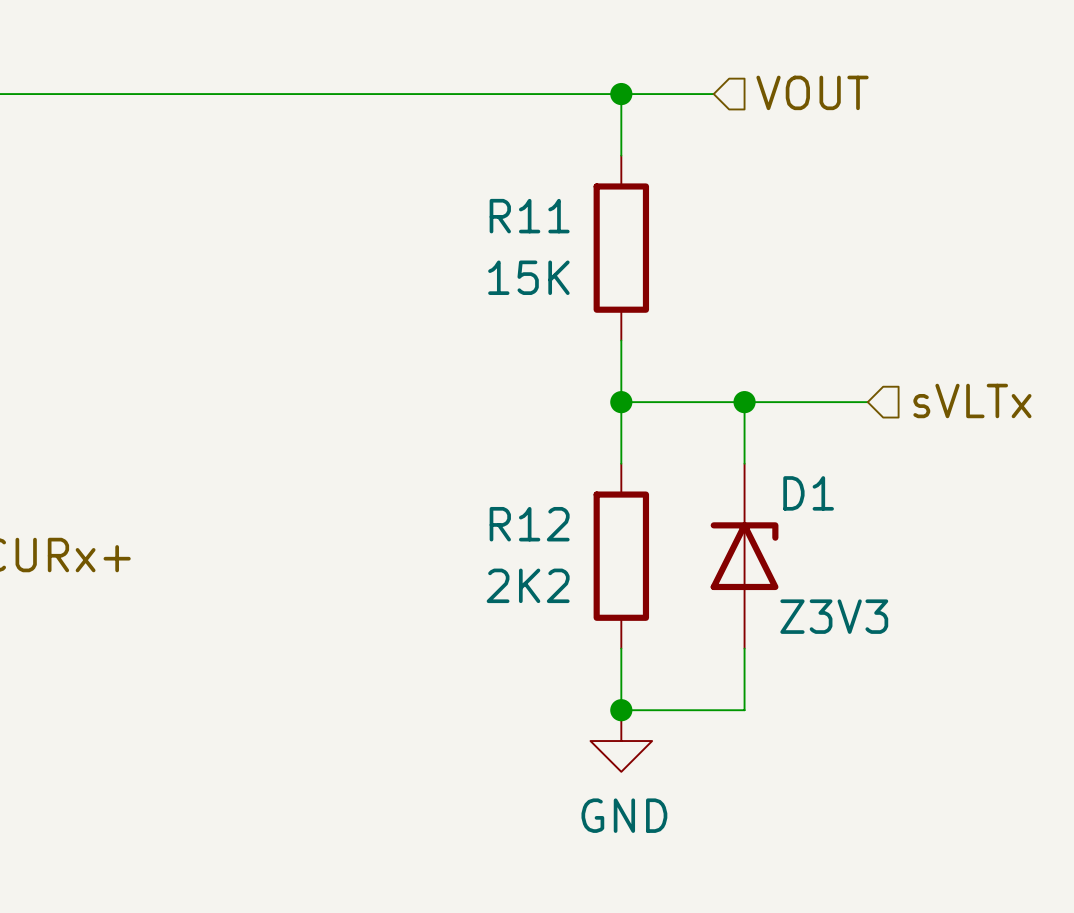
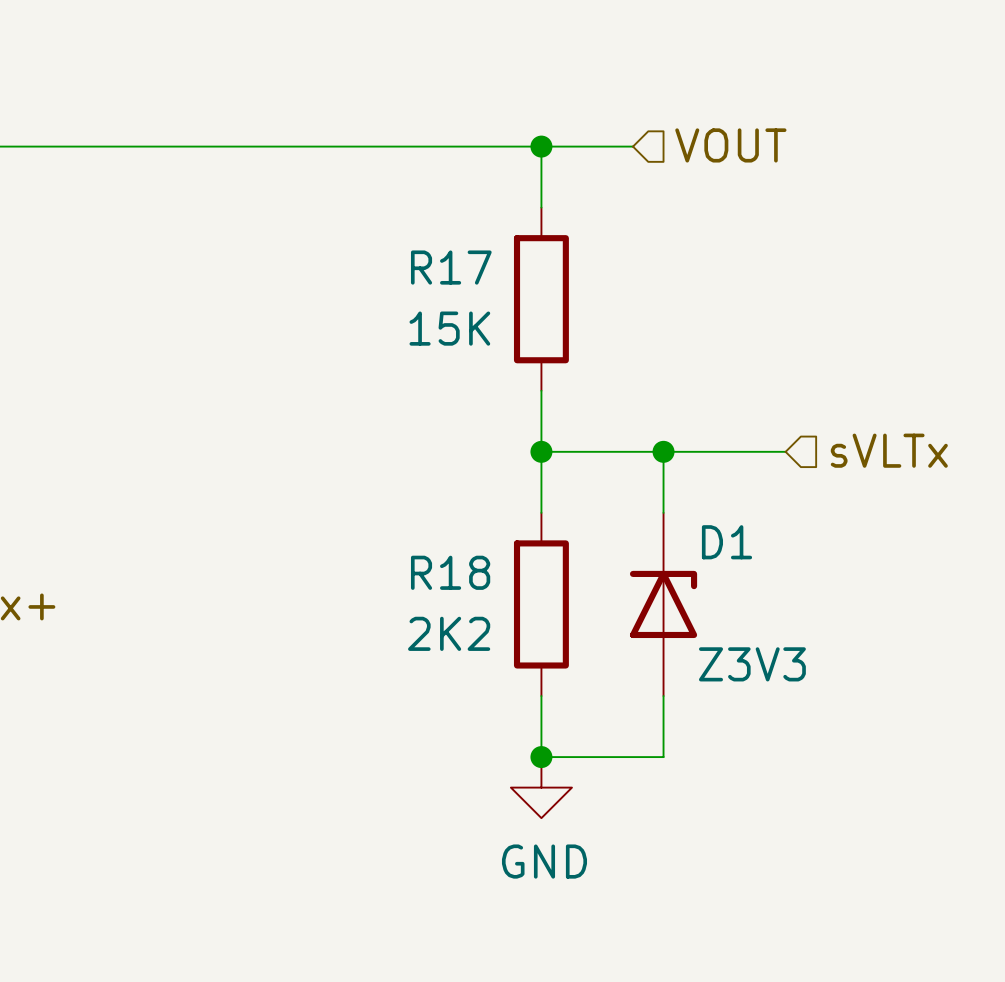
R11 name: R11 (529, 216) -> R17 (451, 267)
R12 name: R12 (529, 524) -> R18 (450, 572)

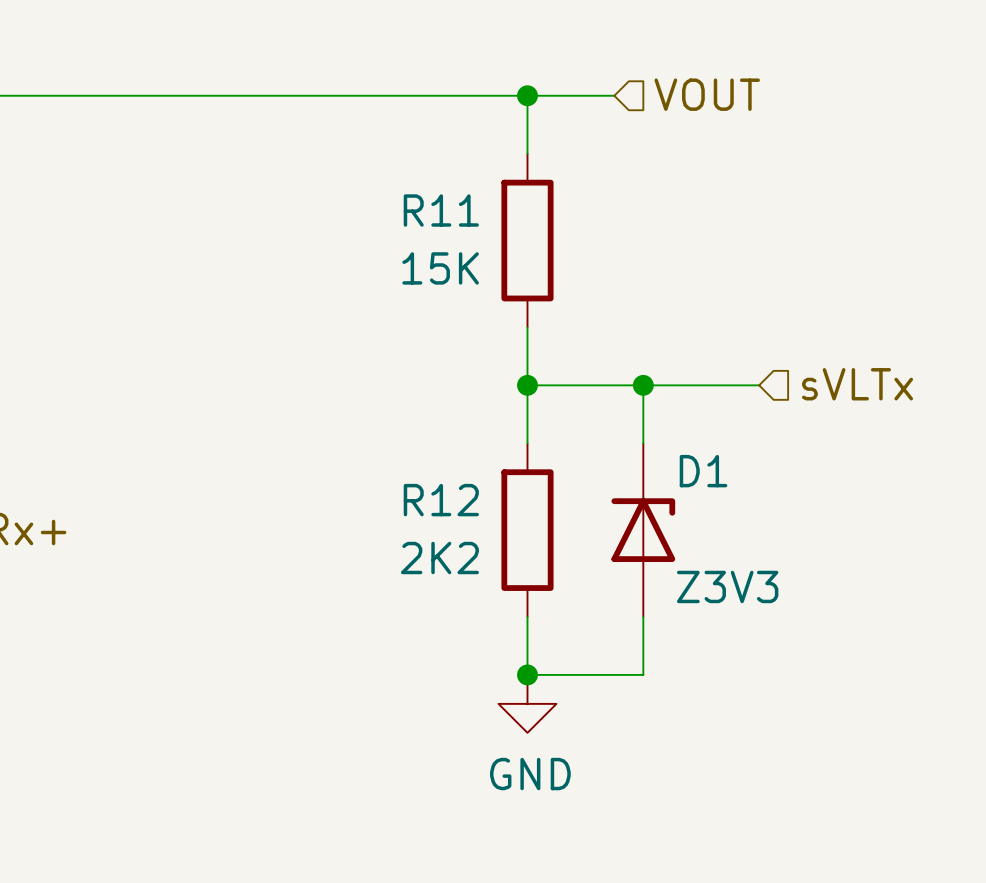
R17 name: R17 (451, 267) -> R11 (441, 210)
R18 name: R18 (450, 572) -> R12 (441, 500)

